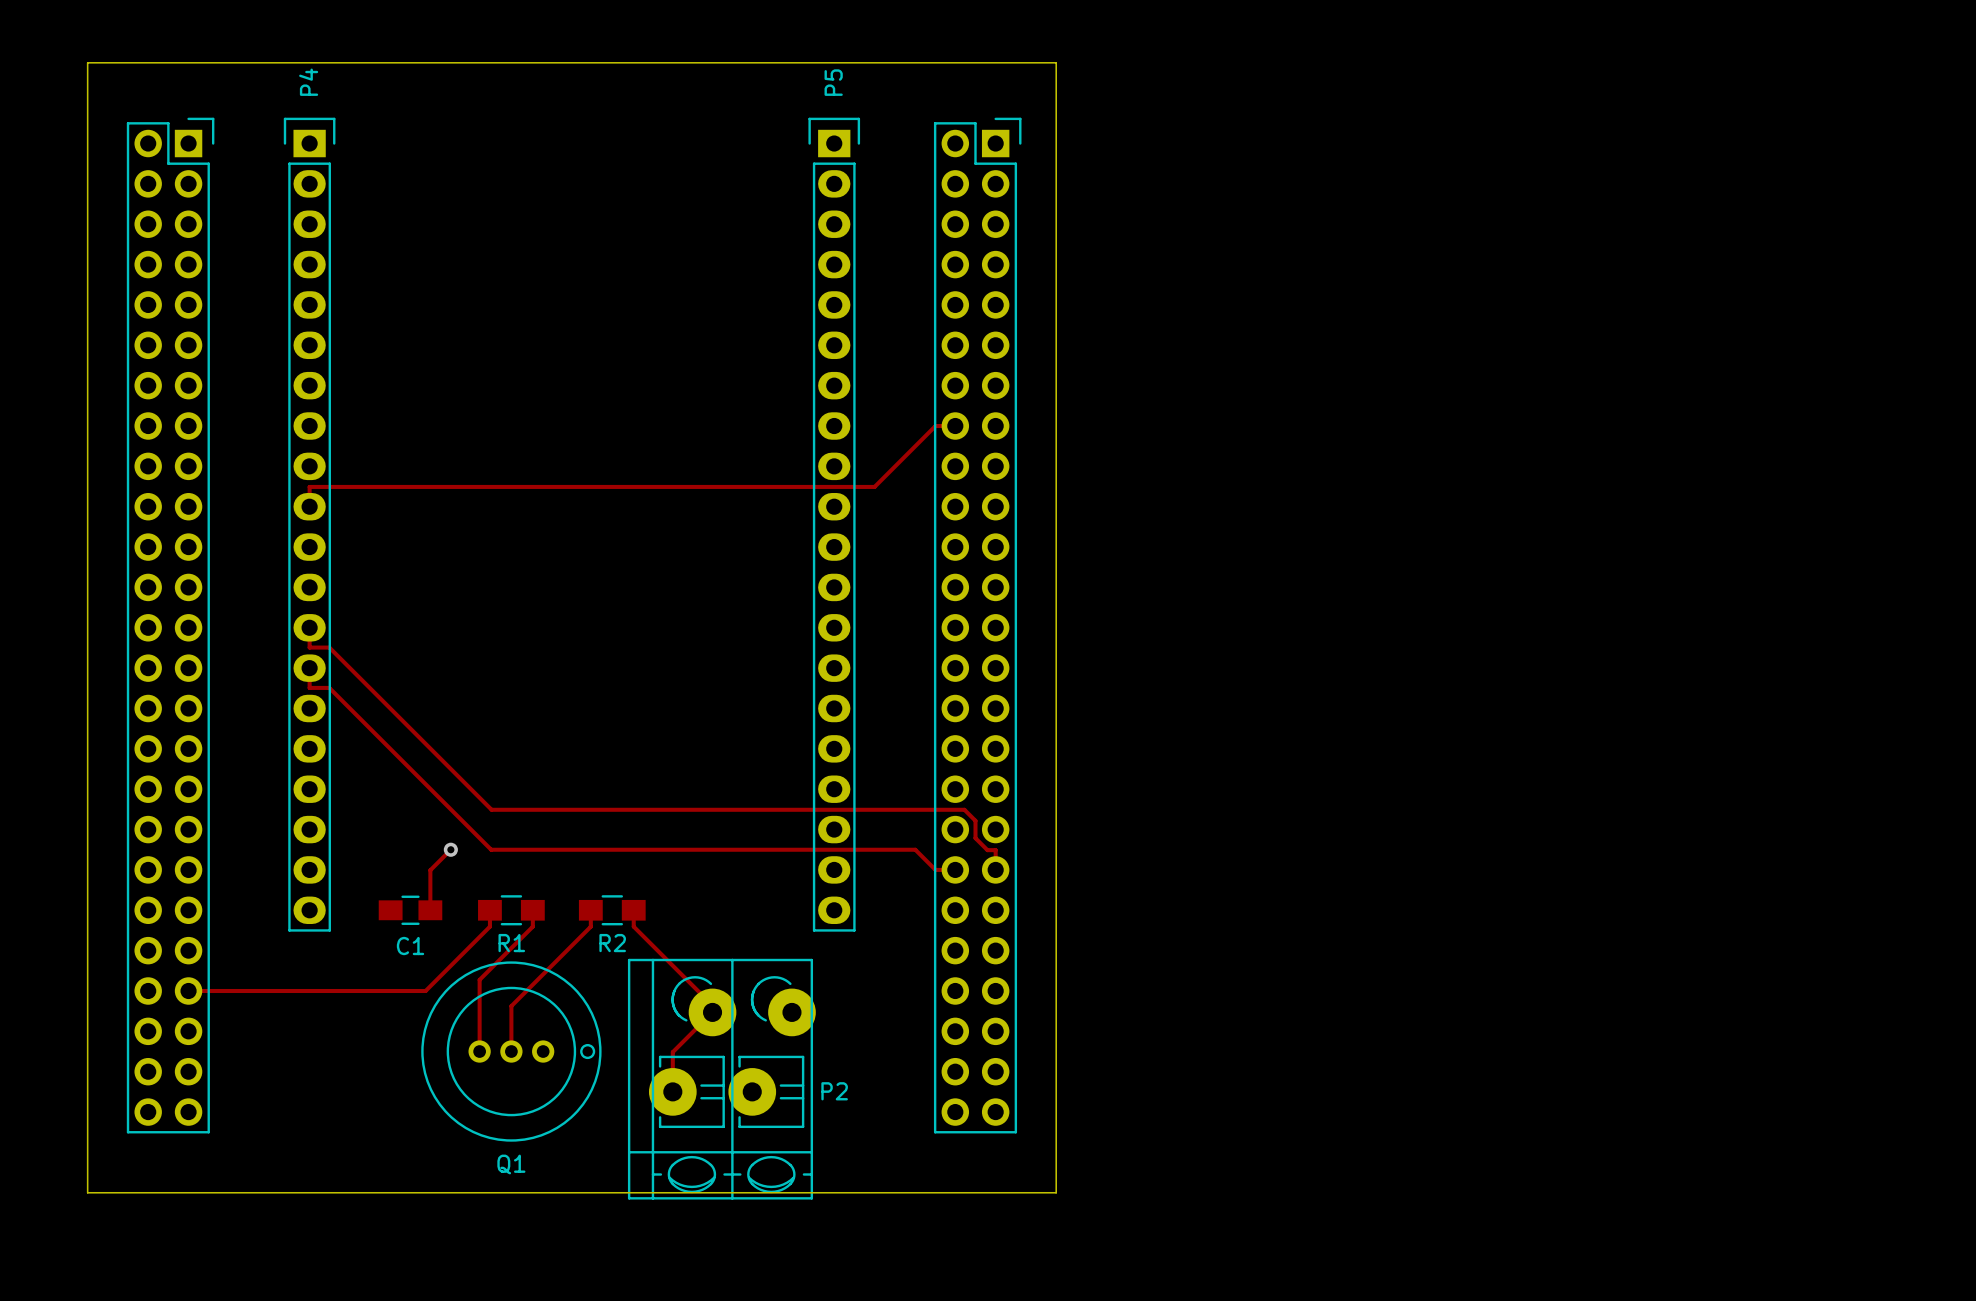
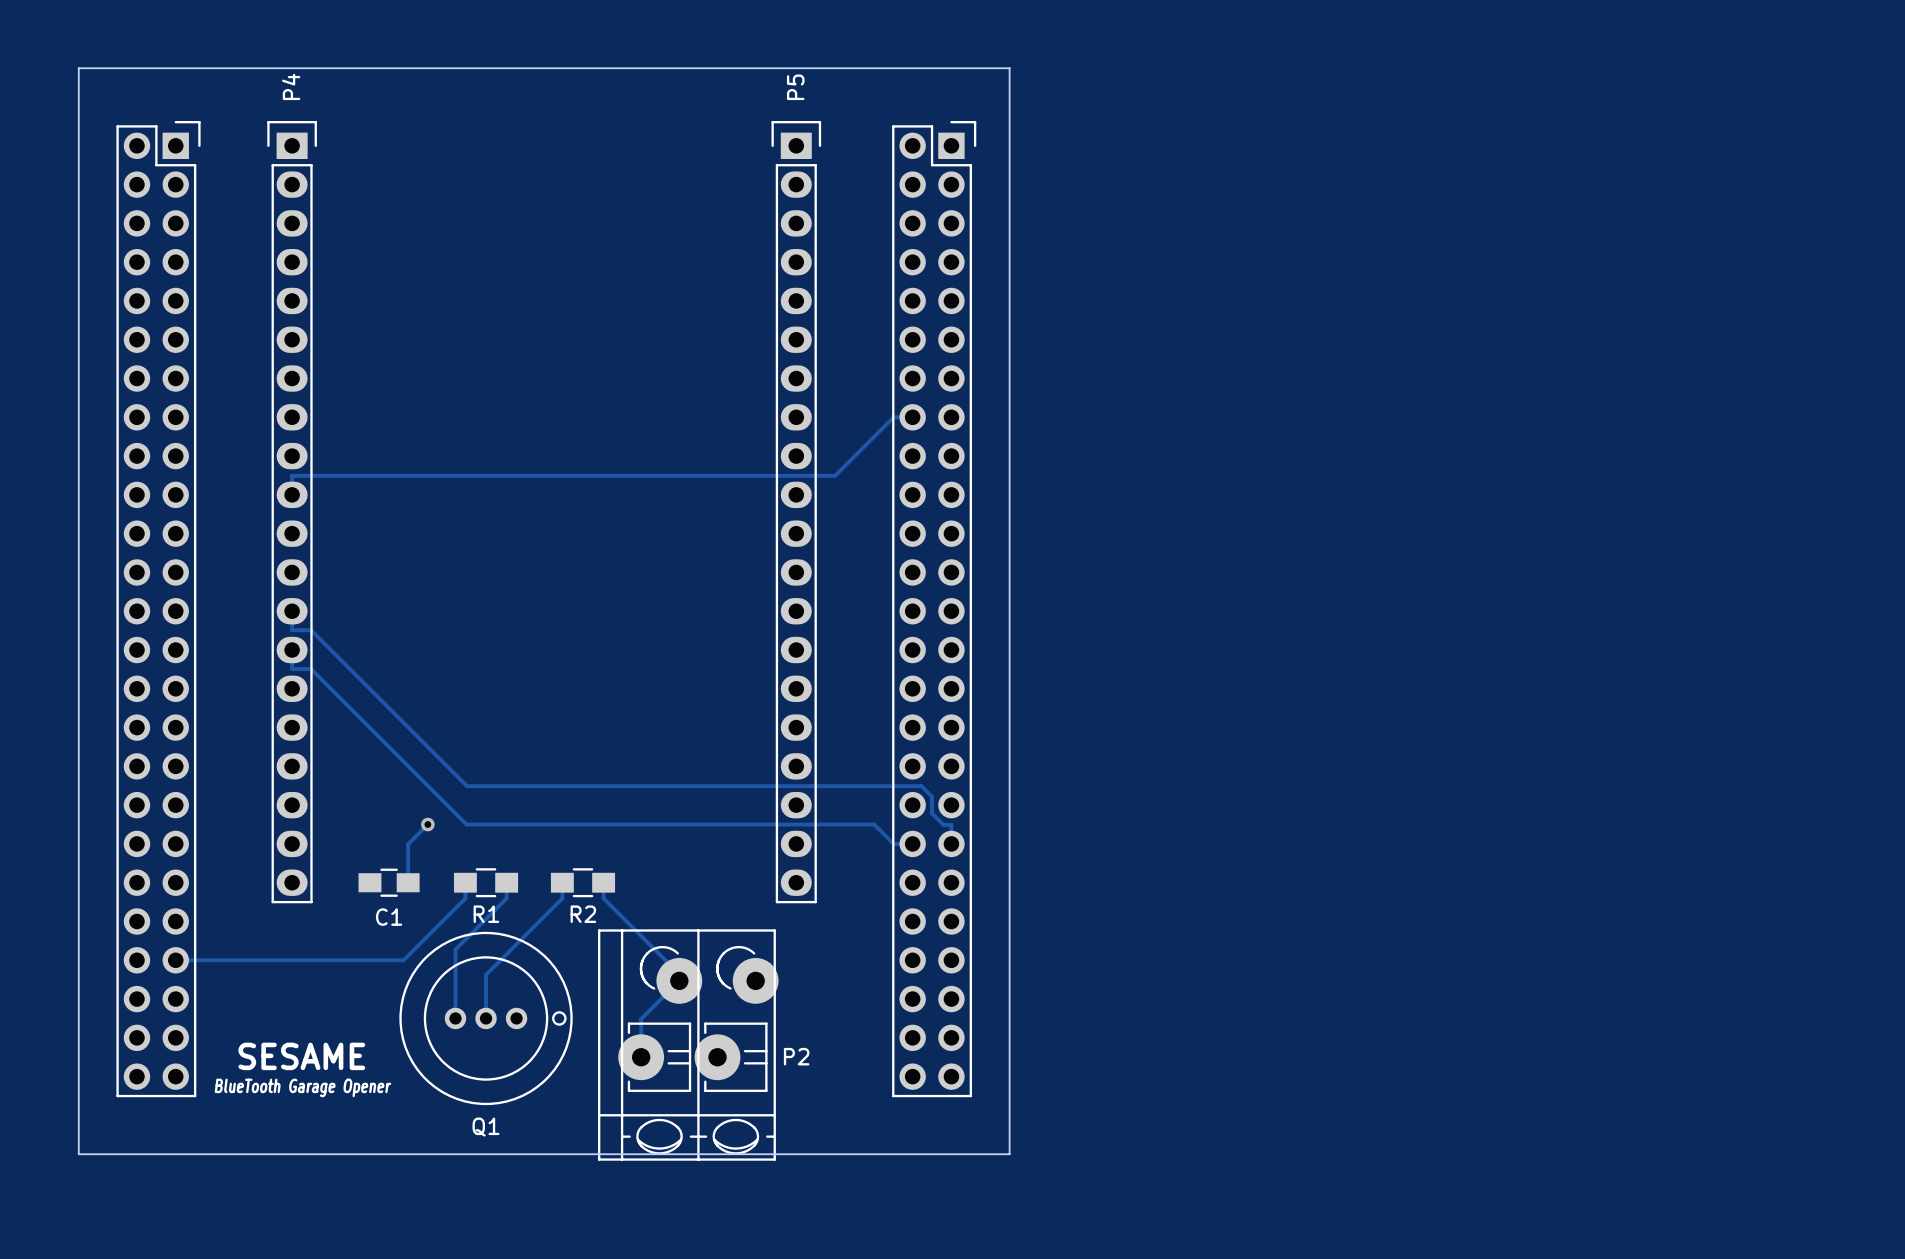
text: none -> SESAME (301, 1056)
text: none -> BlueTooth Garage Opener (302, 1087)

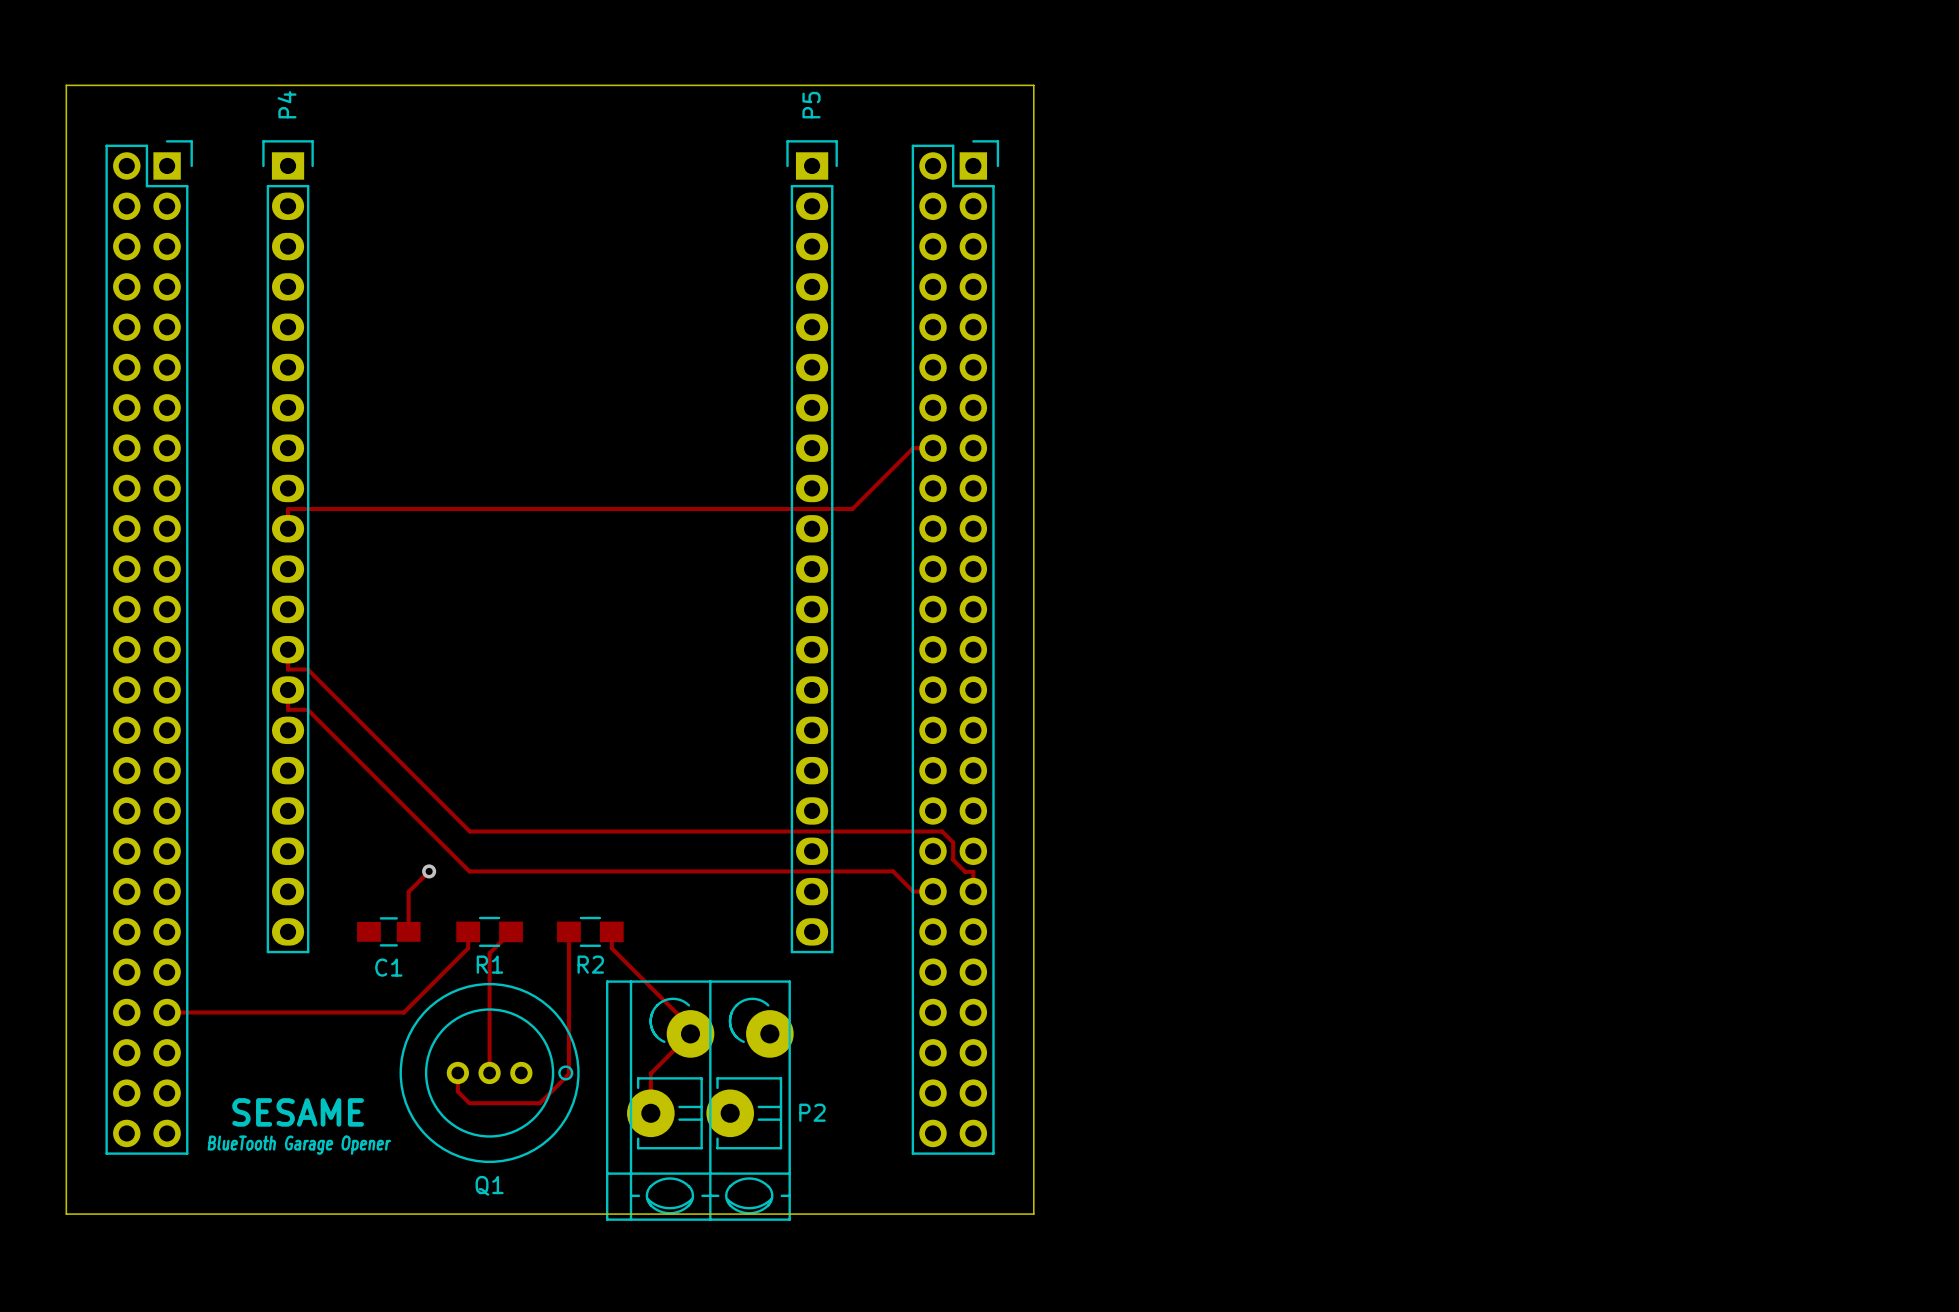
track: (506, 882) (506, 898) (455, 949) (455, 1018) -> (511, 931) (489, 953) (489, 1027)
track: (562, 898) (486, 974) -> (568, 948) (568, 1074) (539, 1103) (469, 1103) (457, 1091) (457, 1072)

